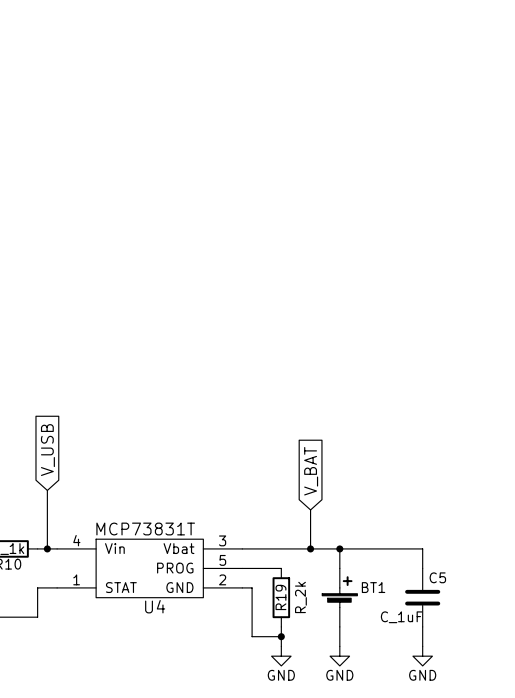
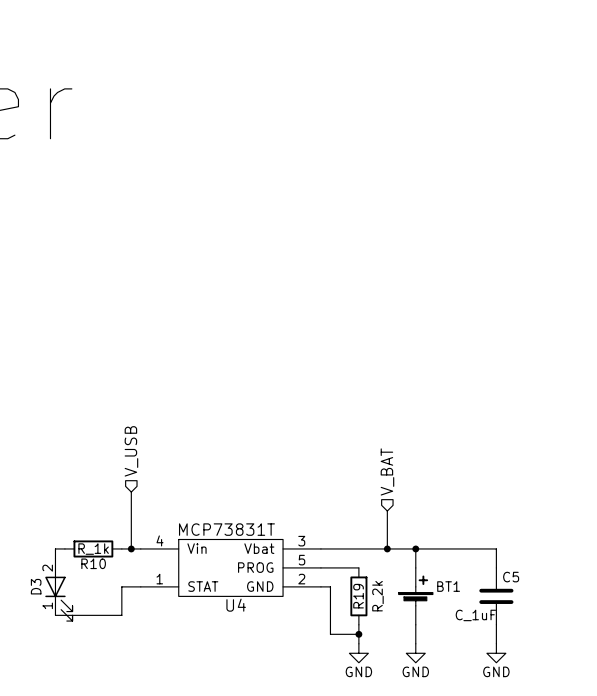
hierarchical label: none -> V_USB (131, 451)
global label: V_USB (47, 450) -> none
hierarchical label: none -> V_BAT (387, 471)
global label: V_BAT (311, 471) -> none

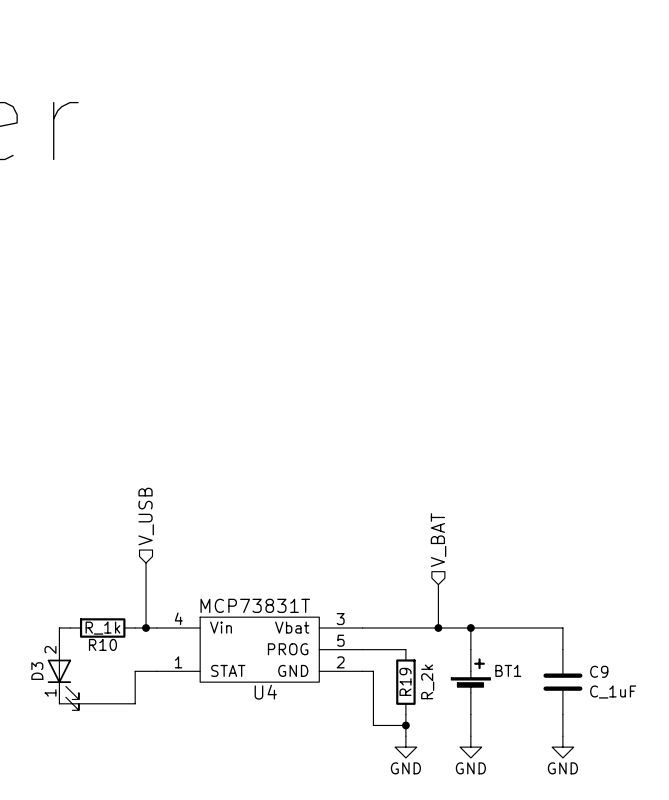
C5 name: C5 (511, 577) -> C9 (599, 671)
C5 value position: C_1uF (475, 615) -> C_1uF (613, 692)

